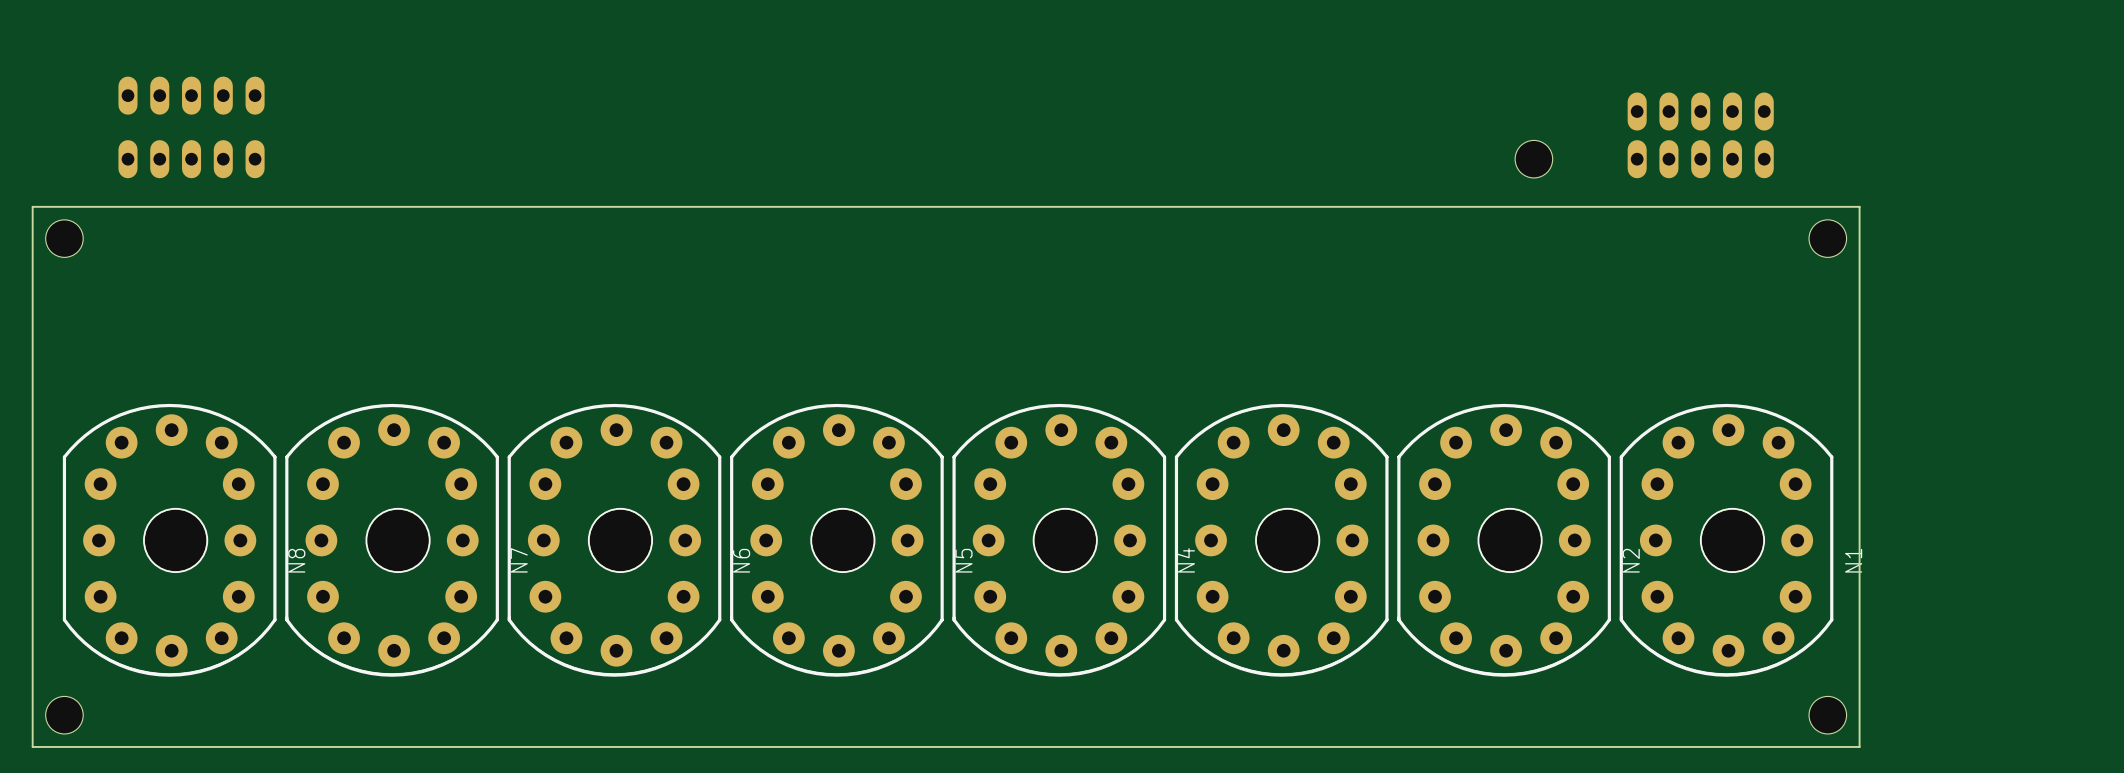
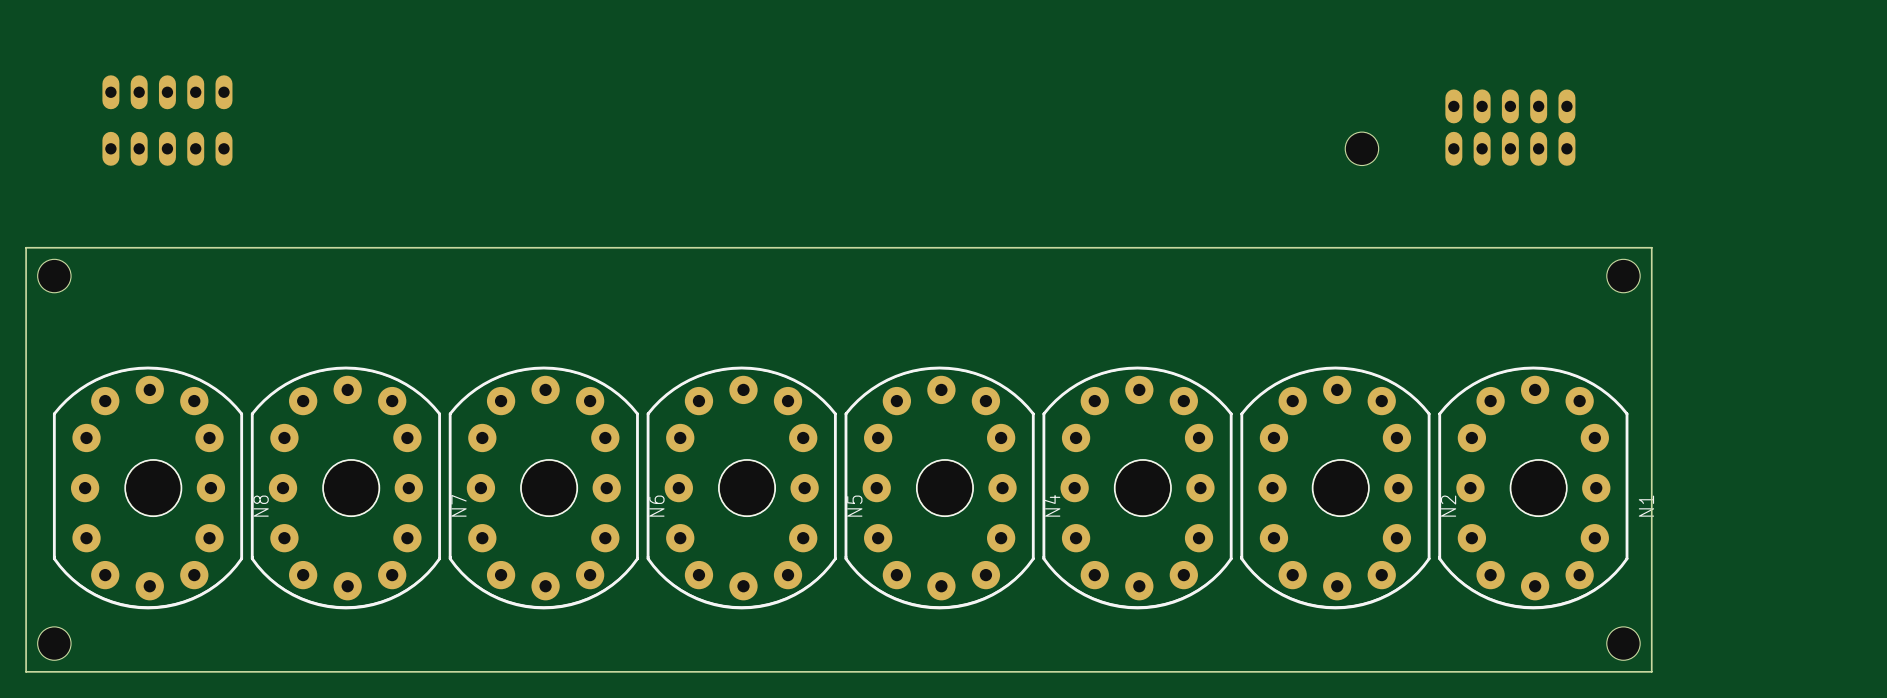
hole position: (64, 238) -> (54, 276)
hole position: (1827, 238) -> (1623, 276)
board edge: (1859, 270) (1859, 206) (32, 206) (32, 270) -> (1651, 247) (26, 247)

